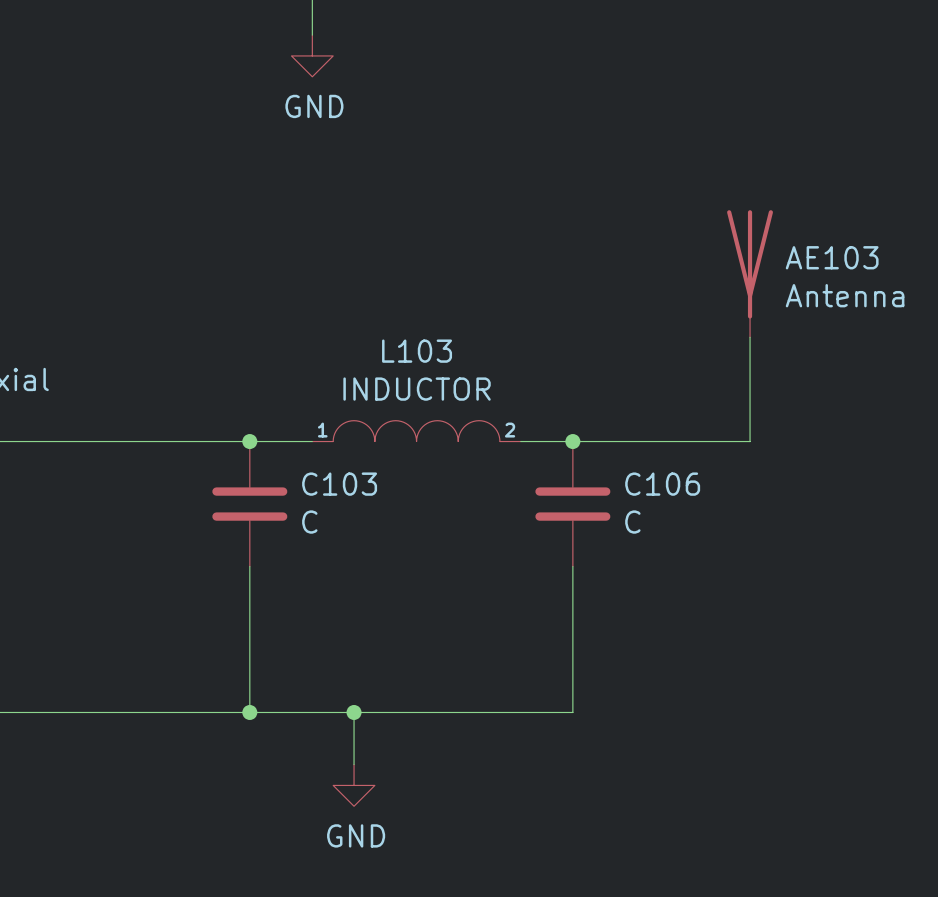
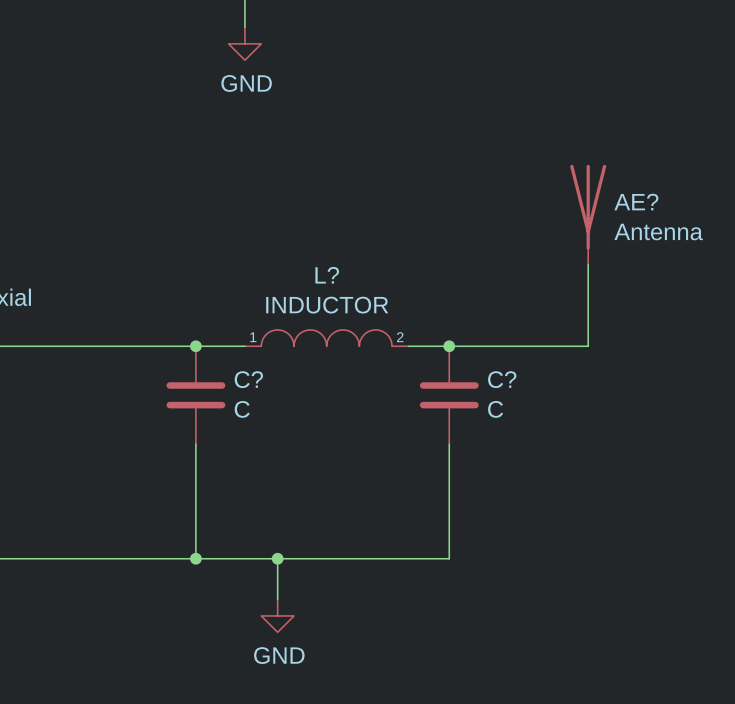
AE103 name: AE103 (832, 257) -> AE? (636, 202)
L103 name: L103 (417, 351) -> L? (327, 275)
C103 name: C103 (339, 484) -> C? (248, 379)
C106 name: C106 (662, 484) -> C? (502, 379)

